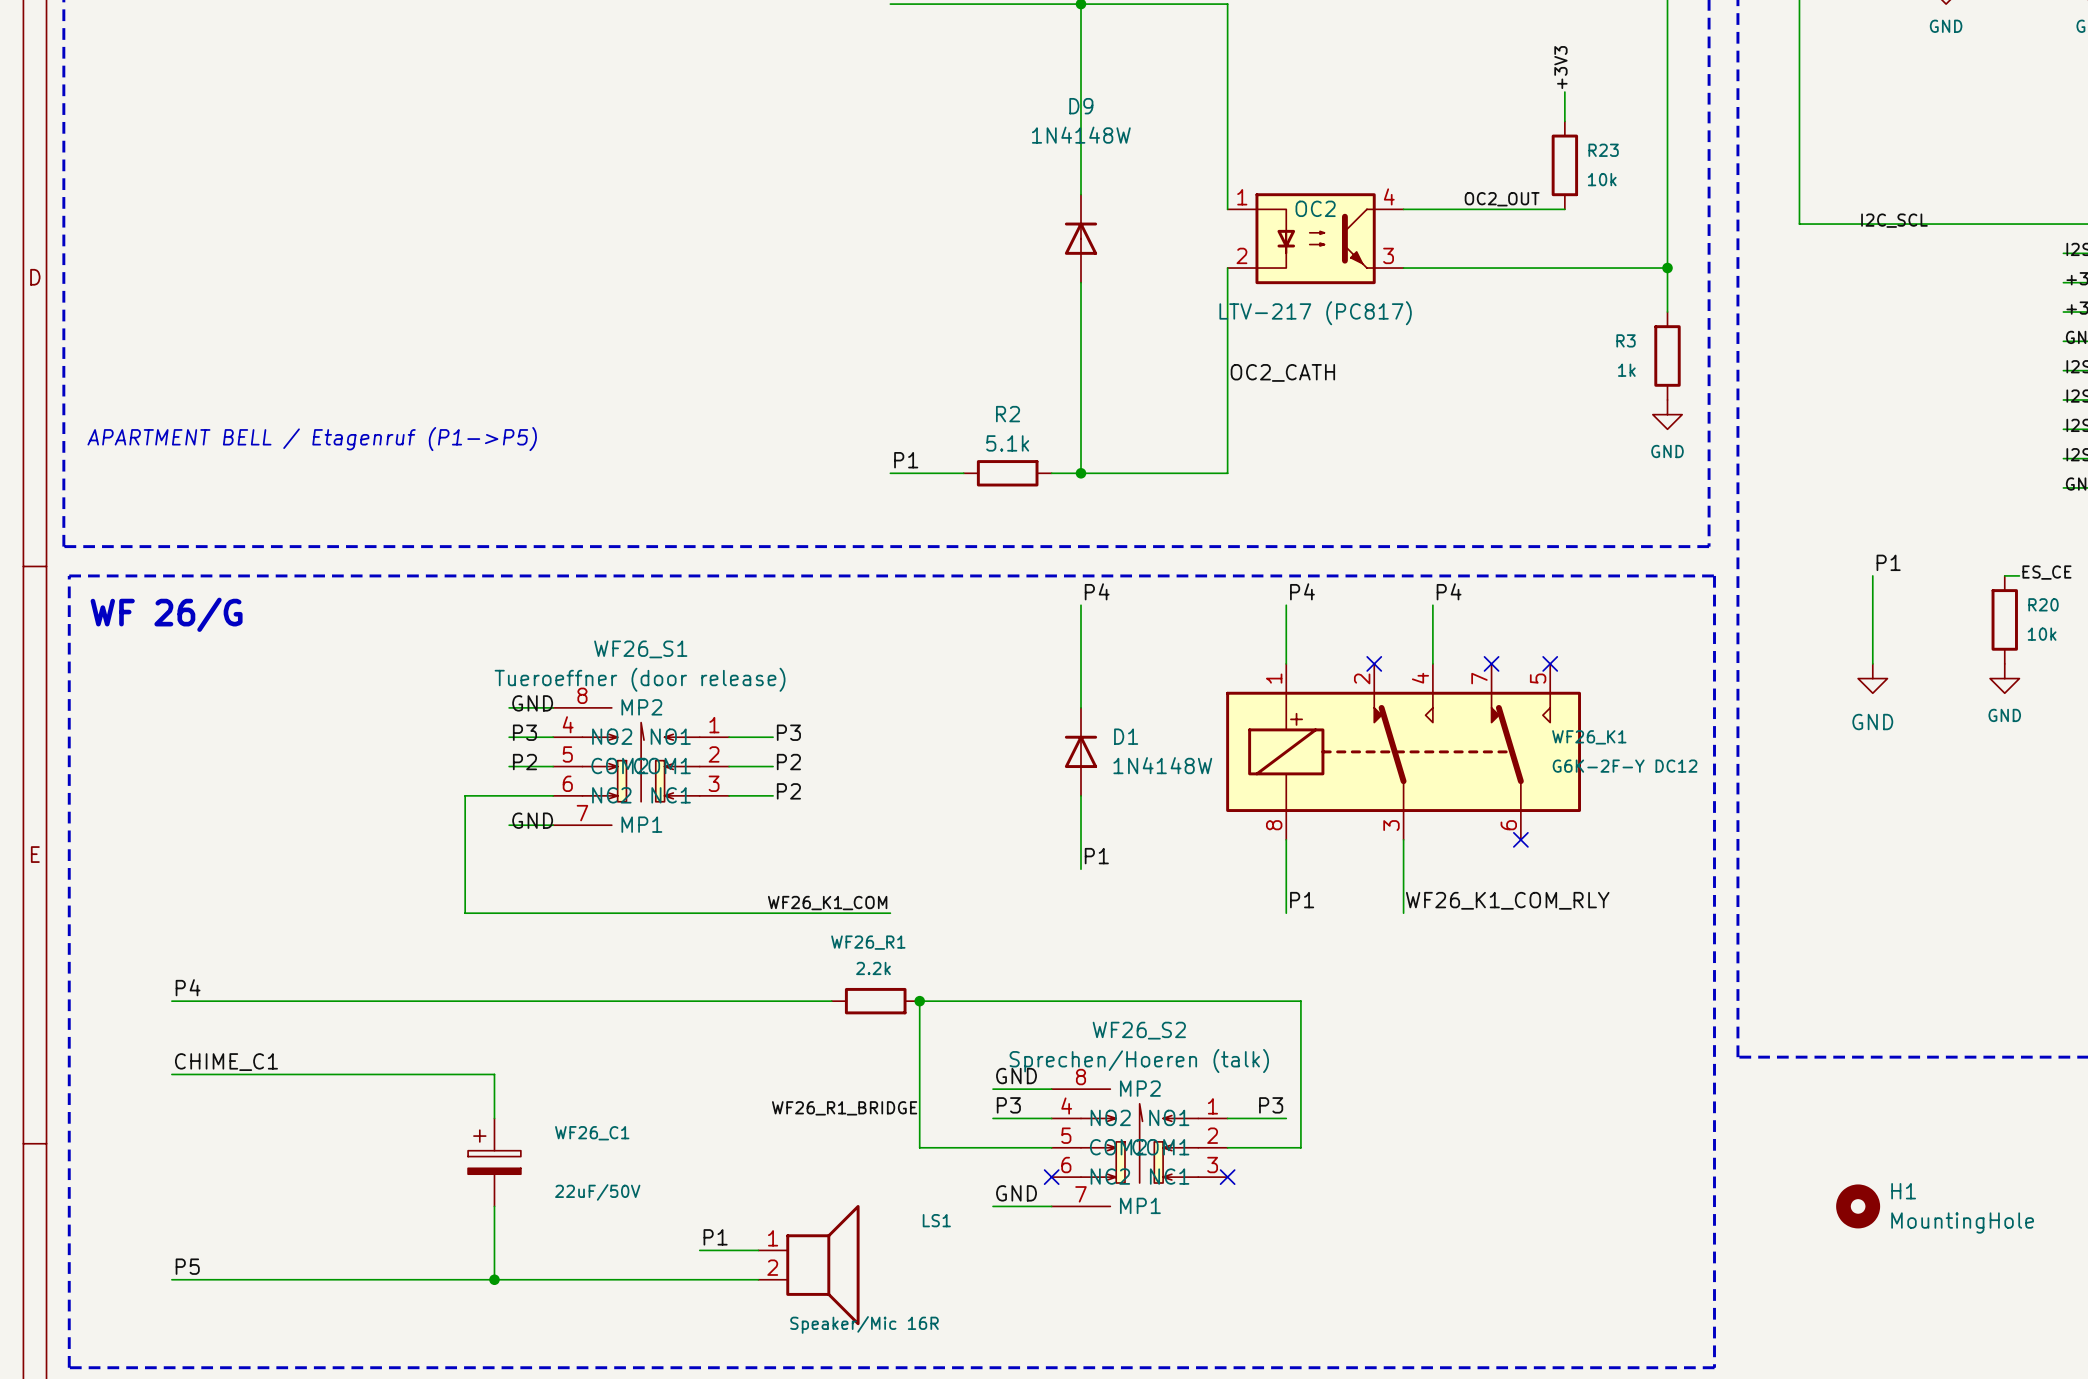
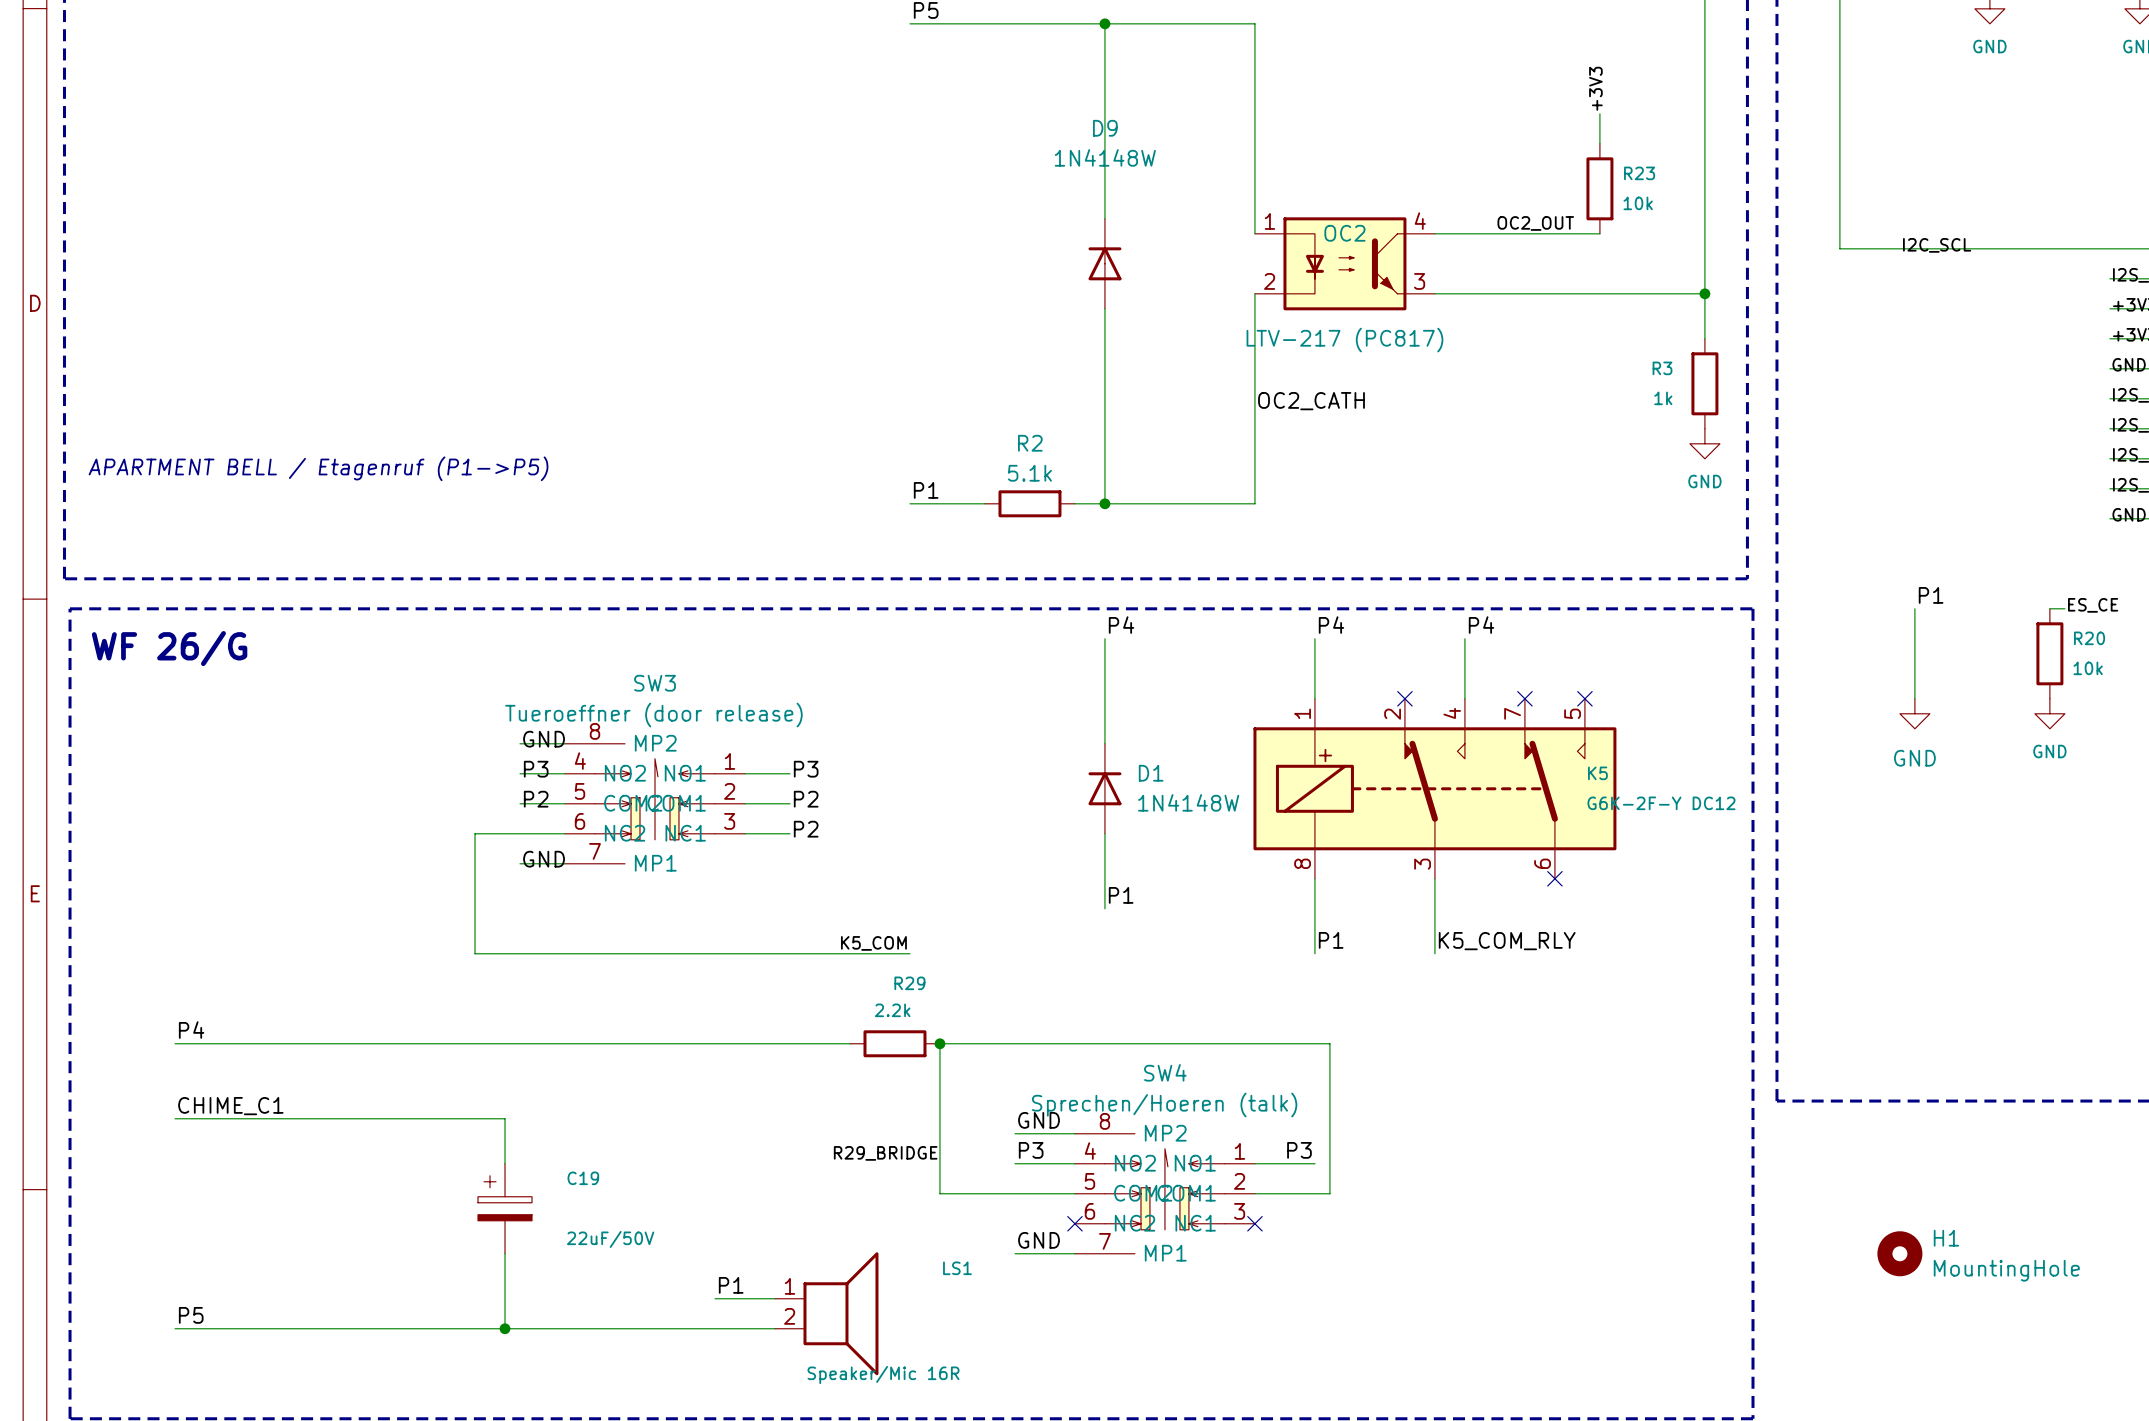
WF26_S1 name: WF26_S1 (640, 649) -> SW3 (654, 683)
WF26_K1 name: WF26_K1 (1589, 737) -> K5 (1597, 773)
label: WF26_K1_COM_RLY (1507, 900) -> K5_COM_RLY (1507, 941)
label: WF26_K1_COM (827, 903) -> K5_COM (873, 943)
WF26_R1 name: WF26_R1 (868, 942) -> R29 (909, 983)
WF26_S2 name: WF26_S2 (1139, 1030) -> SW4 (1165, 1072)
label: WF26_R1_BRIDGE (844, 1108) -> R29_BRIDGE (885, 1153)
WF26_C1 name: WF26_C1 (592, 1133) -> C19 (583, 1178)

